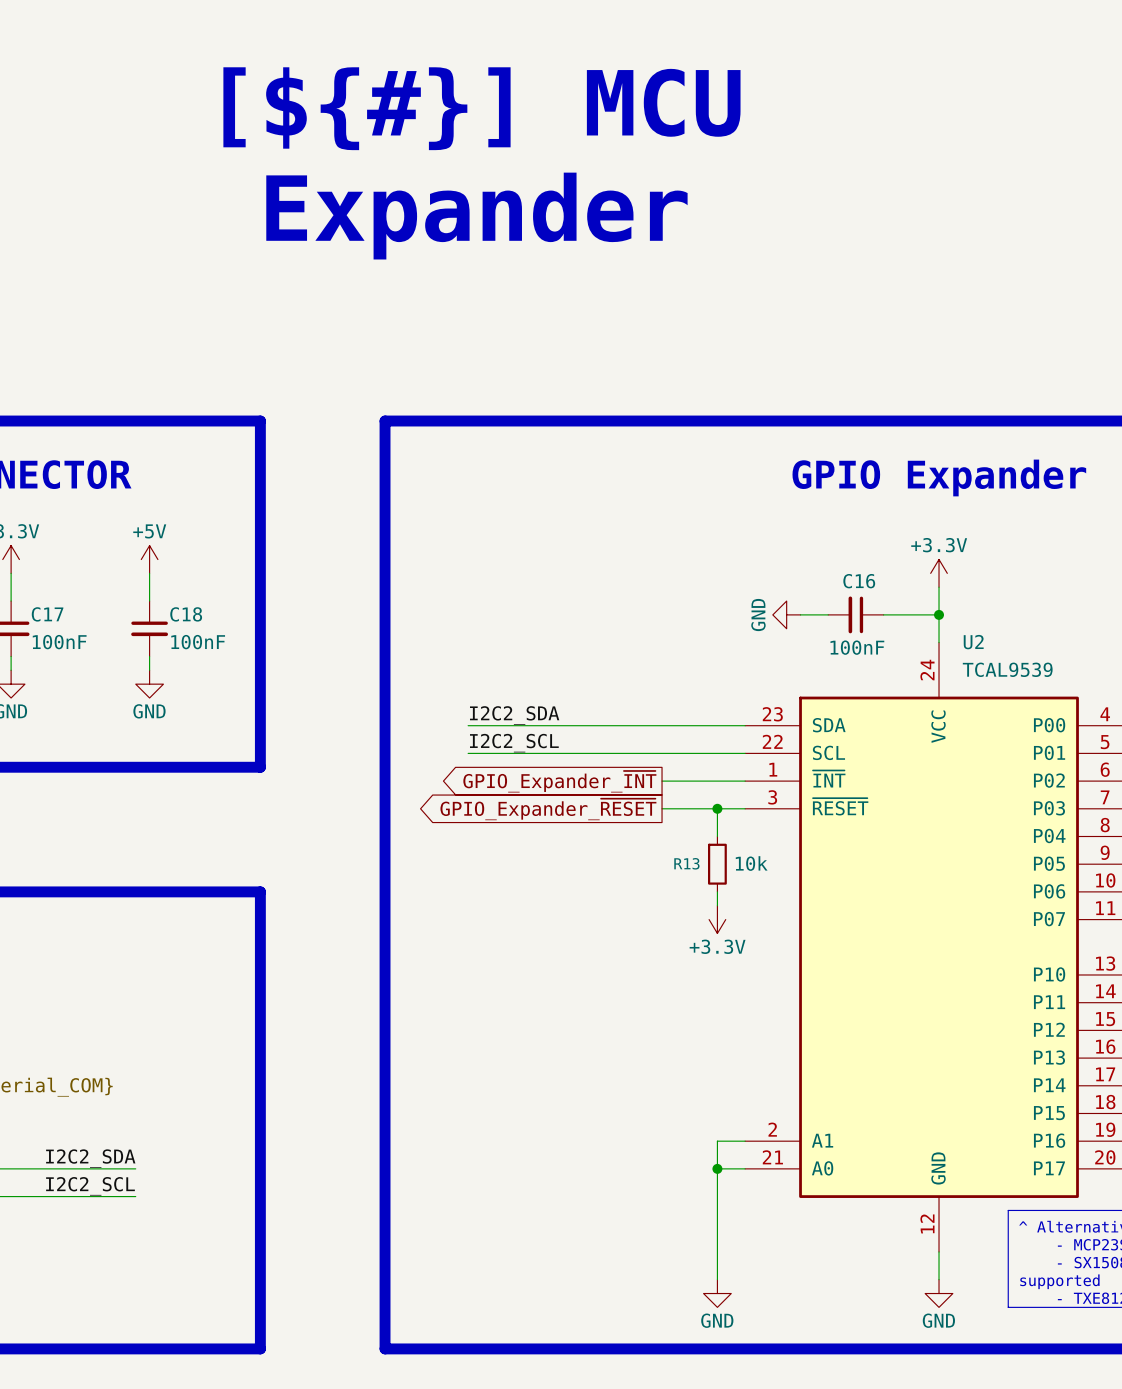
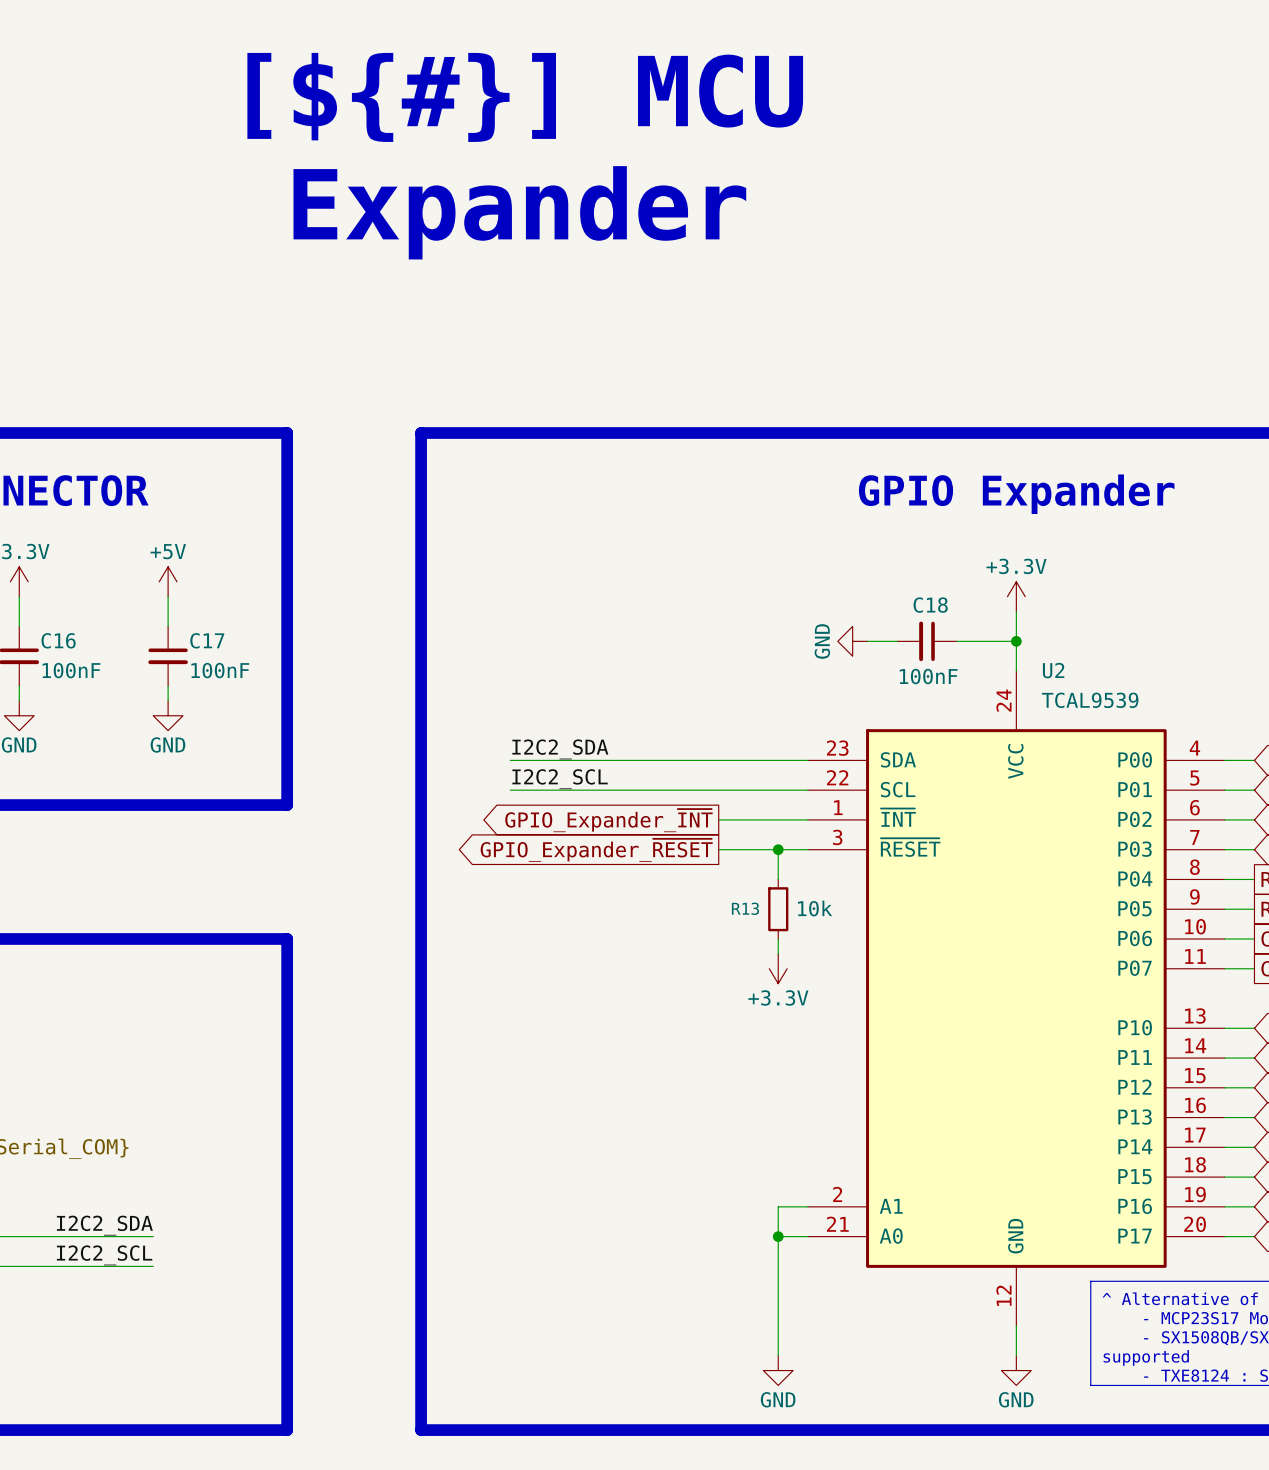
C16 name: C16 (859, 581) -> C18 (930, 605)
C17 name: C17 (47, 614) -> C16 (58, 640)
C18 name: C18 (186, 614) -> C17 (207, 640)

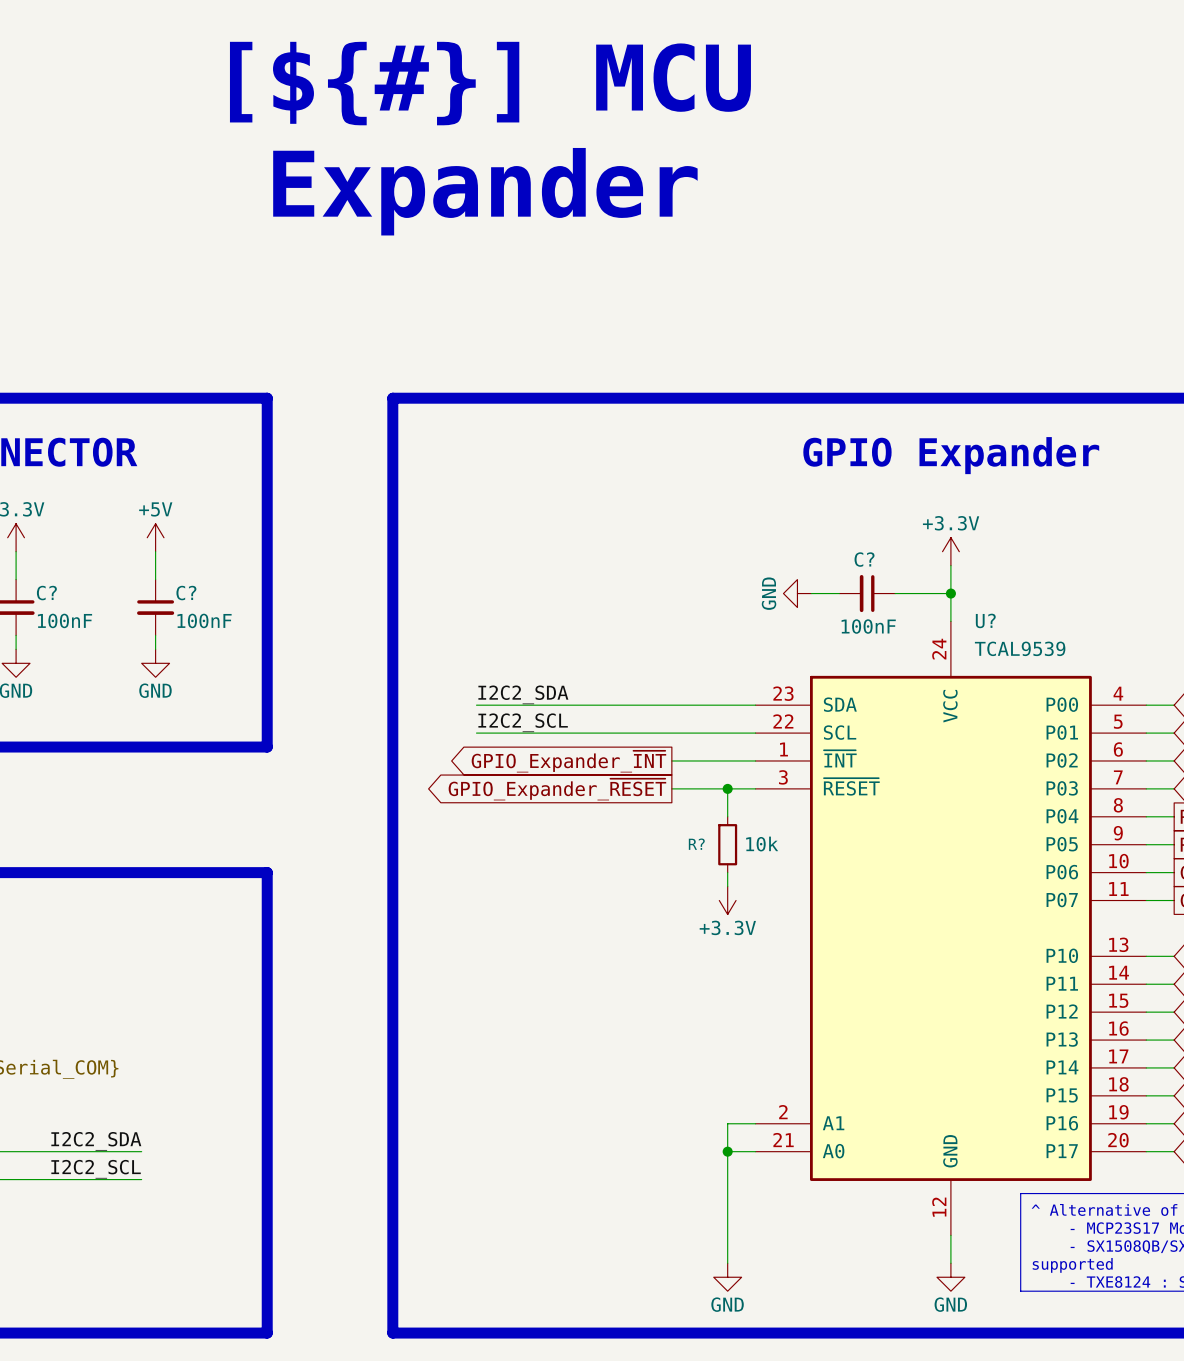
C18 name: C18 (930, 605) -> C? (864, 559)
C16 name: C16 (58, 640) -> C? (46, 593)
C17 name: C17 (207, 640) -> C? (186, 593)
U2 name: U2 (1053, 670) -> U? (985, 620)
R13 name: R13 (745, 908) -> R? (696, 844)

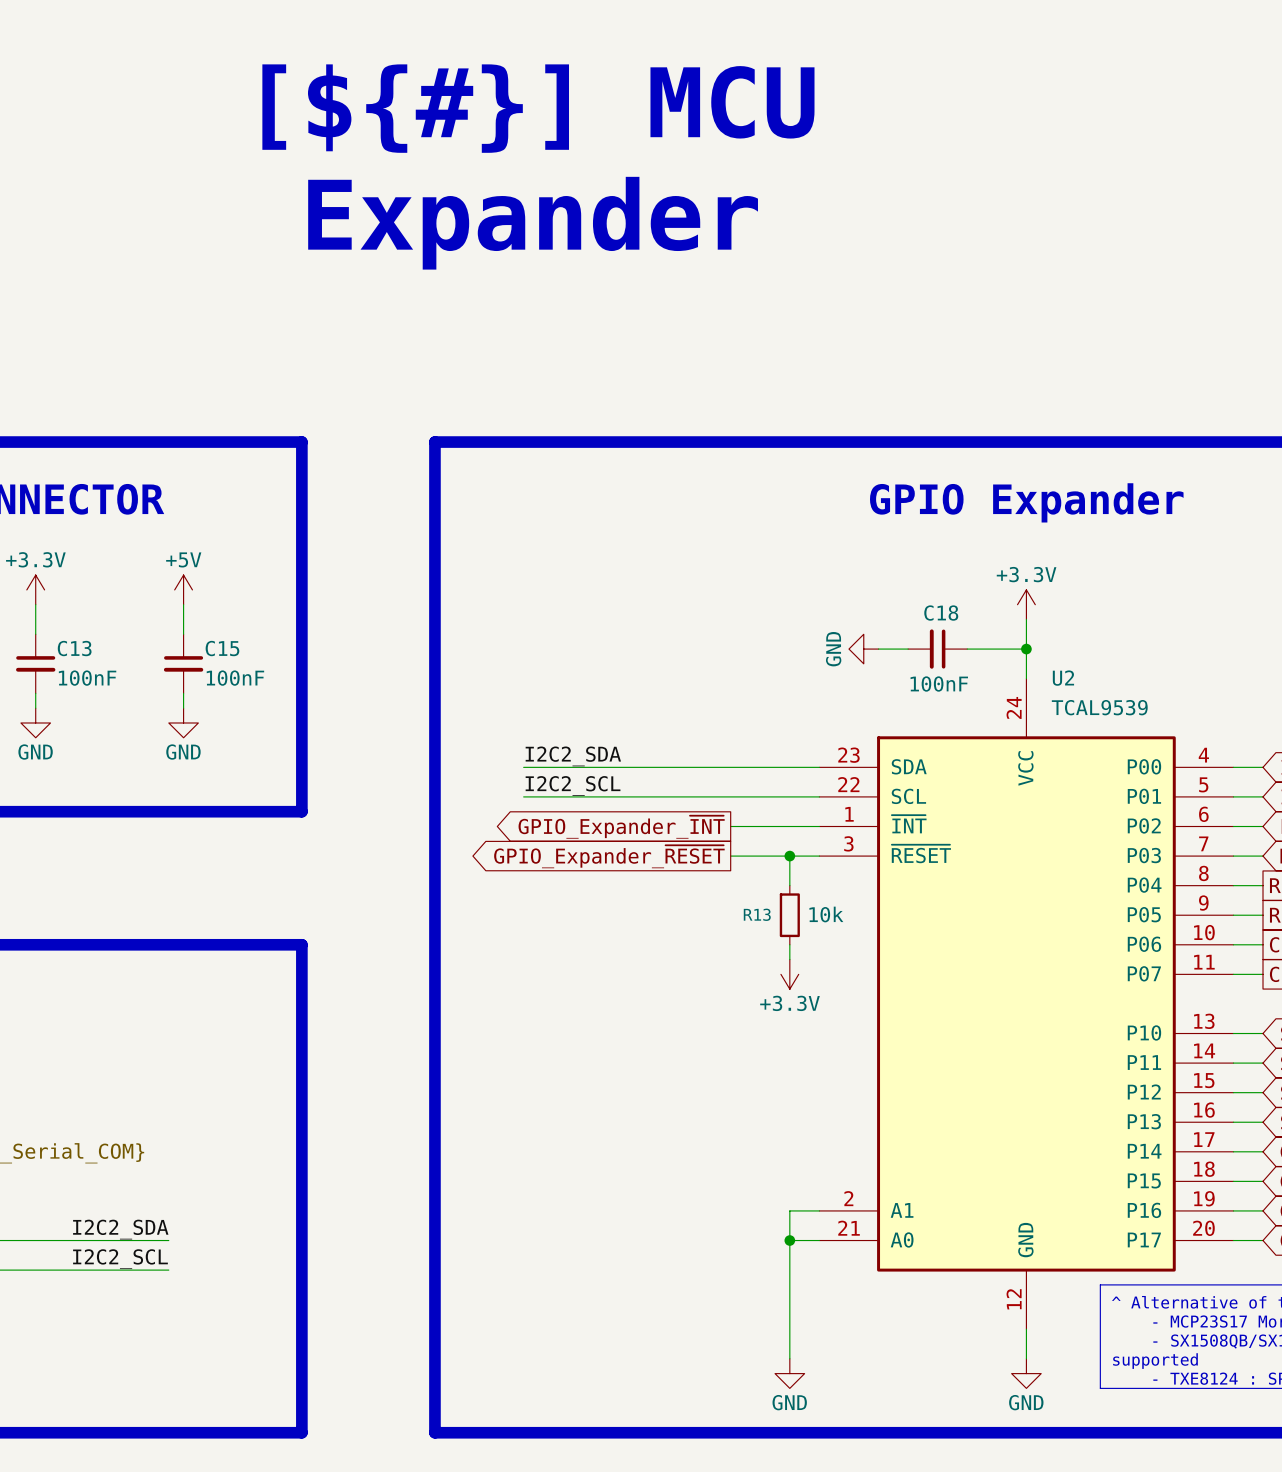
C? name: C? (864, 559) -> C18 (941, 613)
C? name: C? (46, 593) -> C13 (74, 648)
C? name: C? (186, 593) -> C15 (222, 648)
U? name: U? (985, 620) -> U2 (1063, 678)
R? name: R? (696, 844) -> R13 (757, 914)

